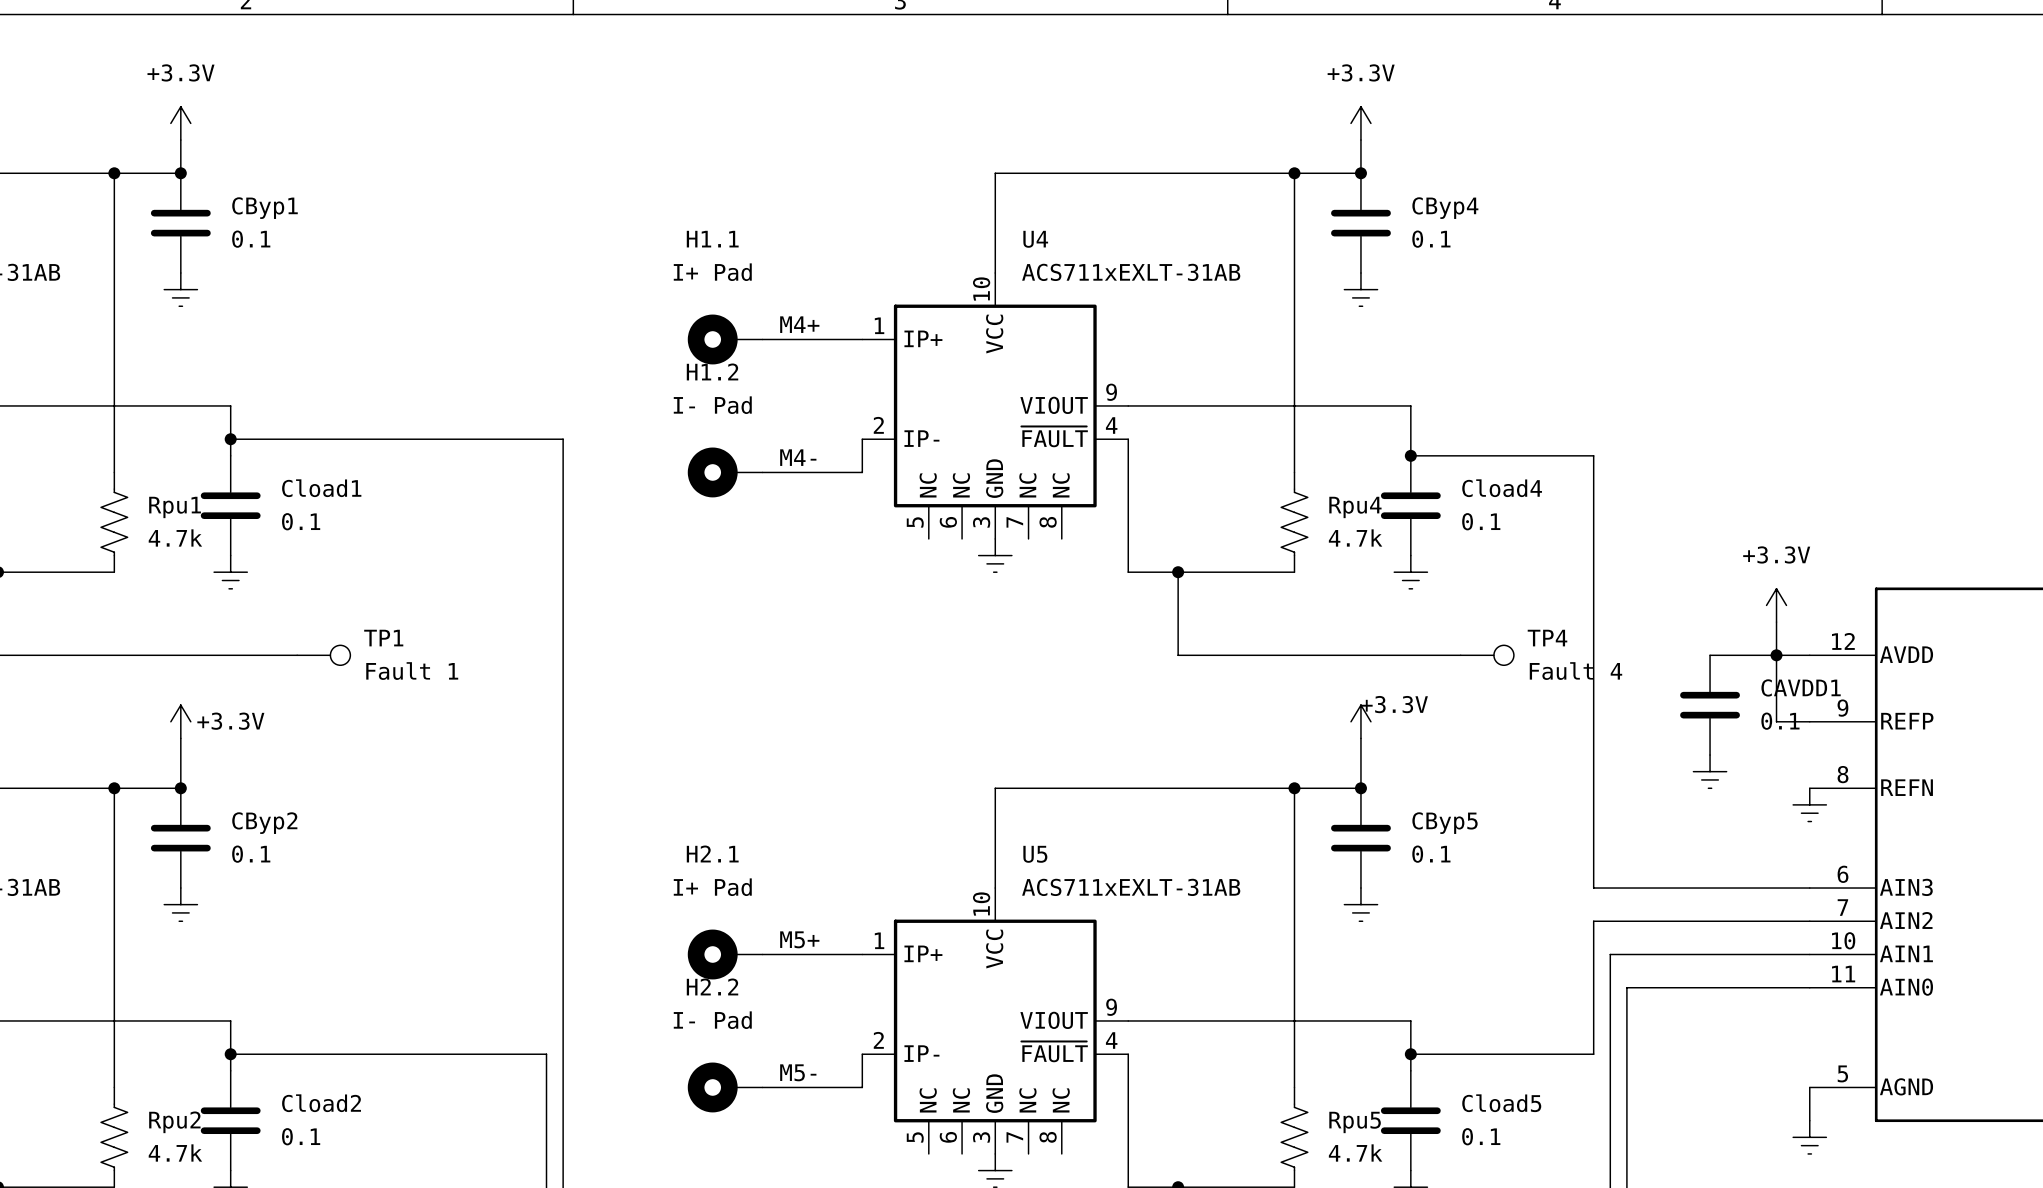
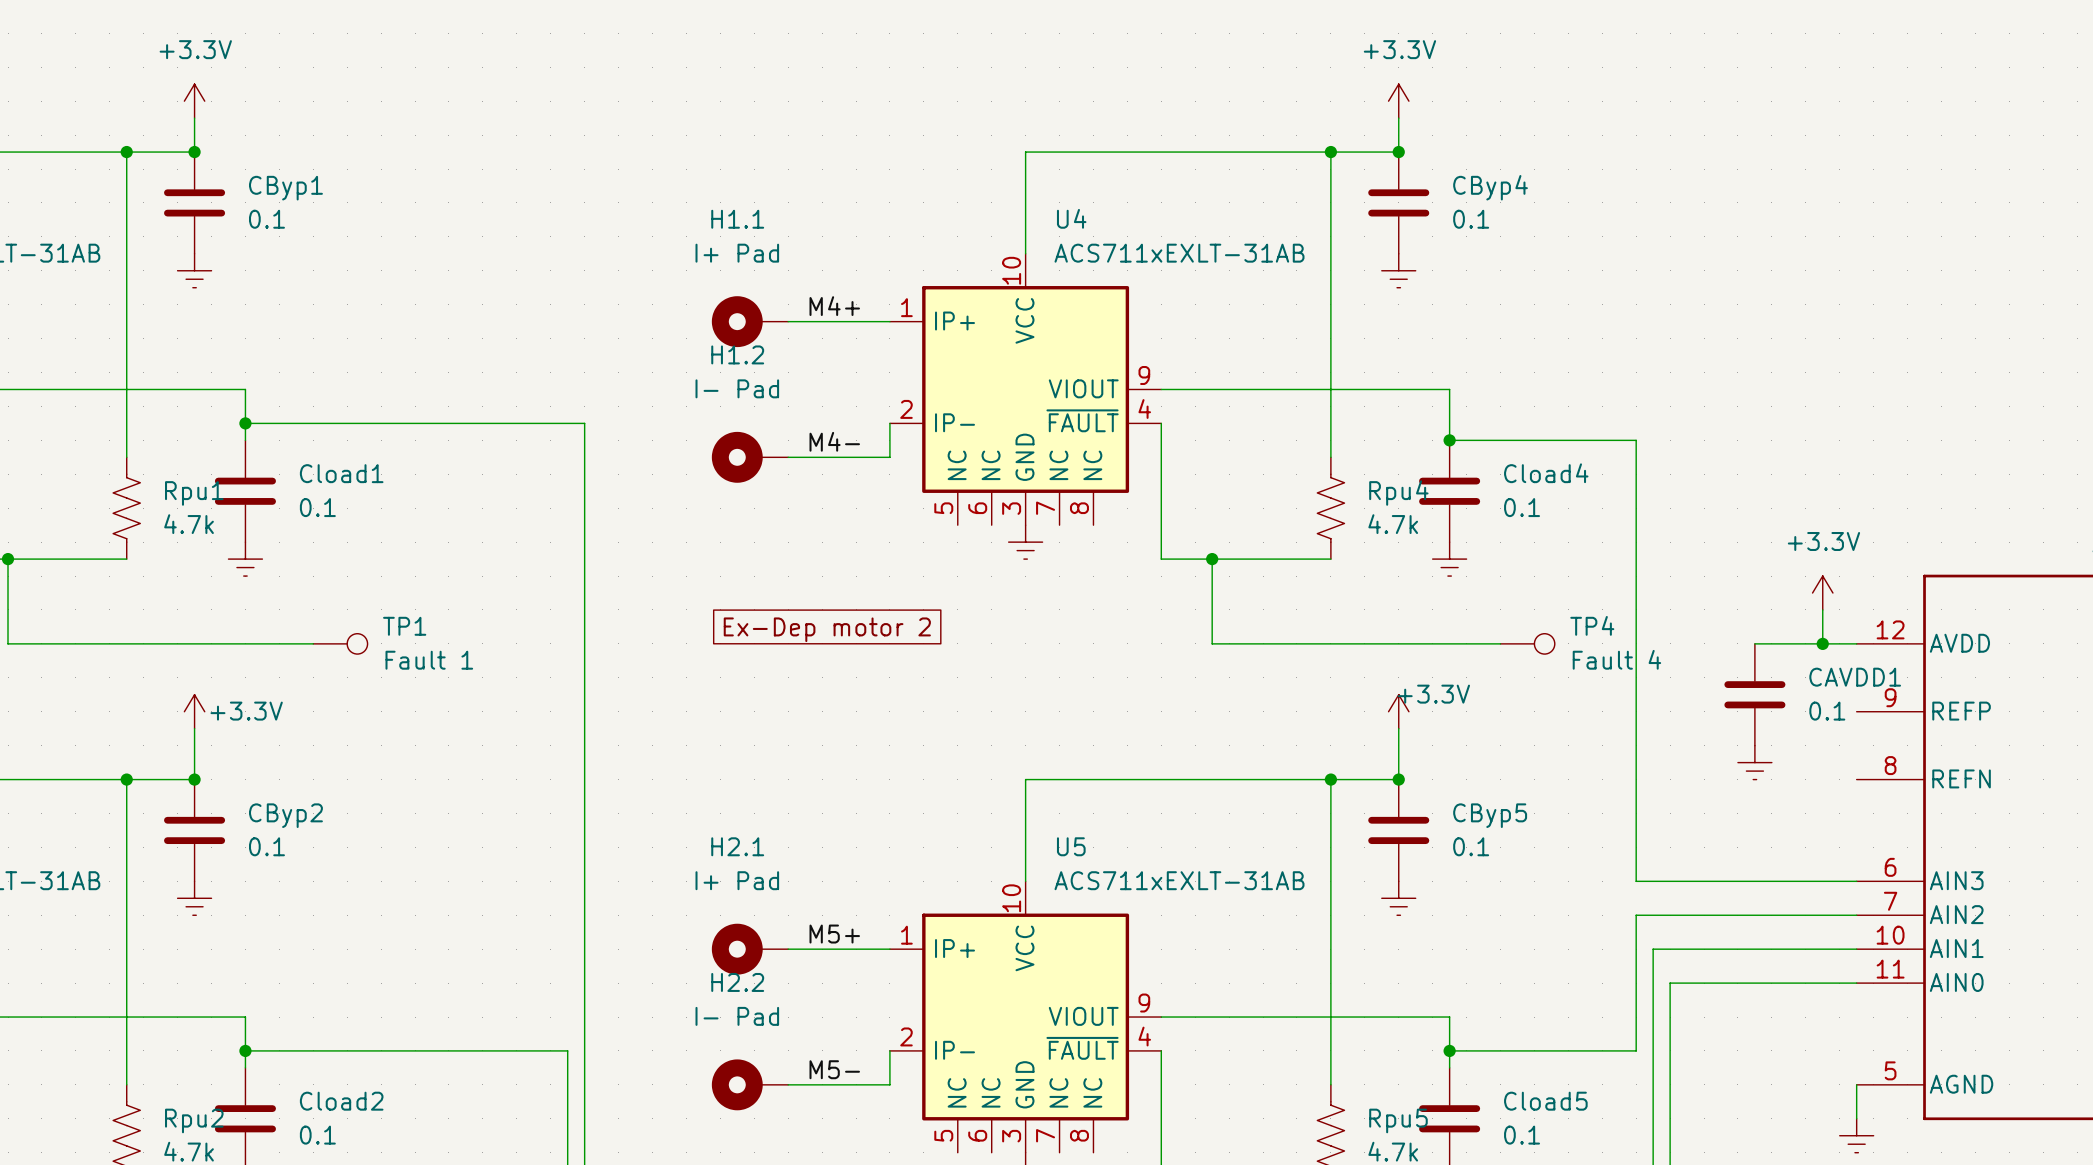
global label: none -> Ex-Dep motor 2 (827, 629)
wire: (1776, 655) (1776, 721) (1809, 721) -> none
power symbol: (1809, 804) -> none

